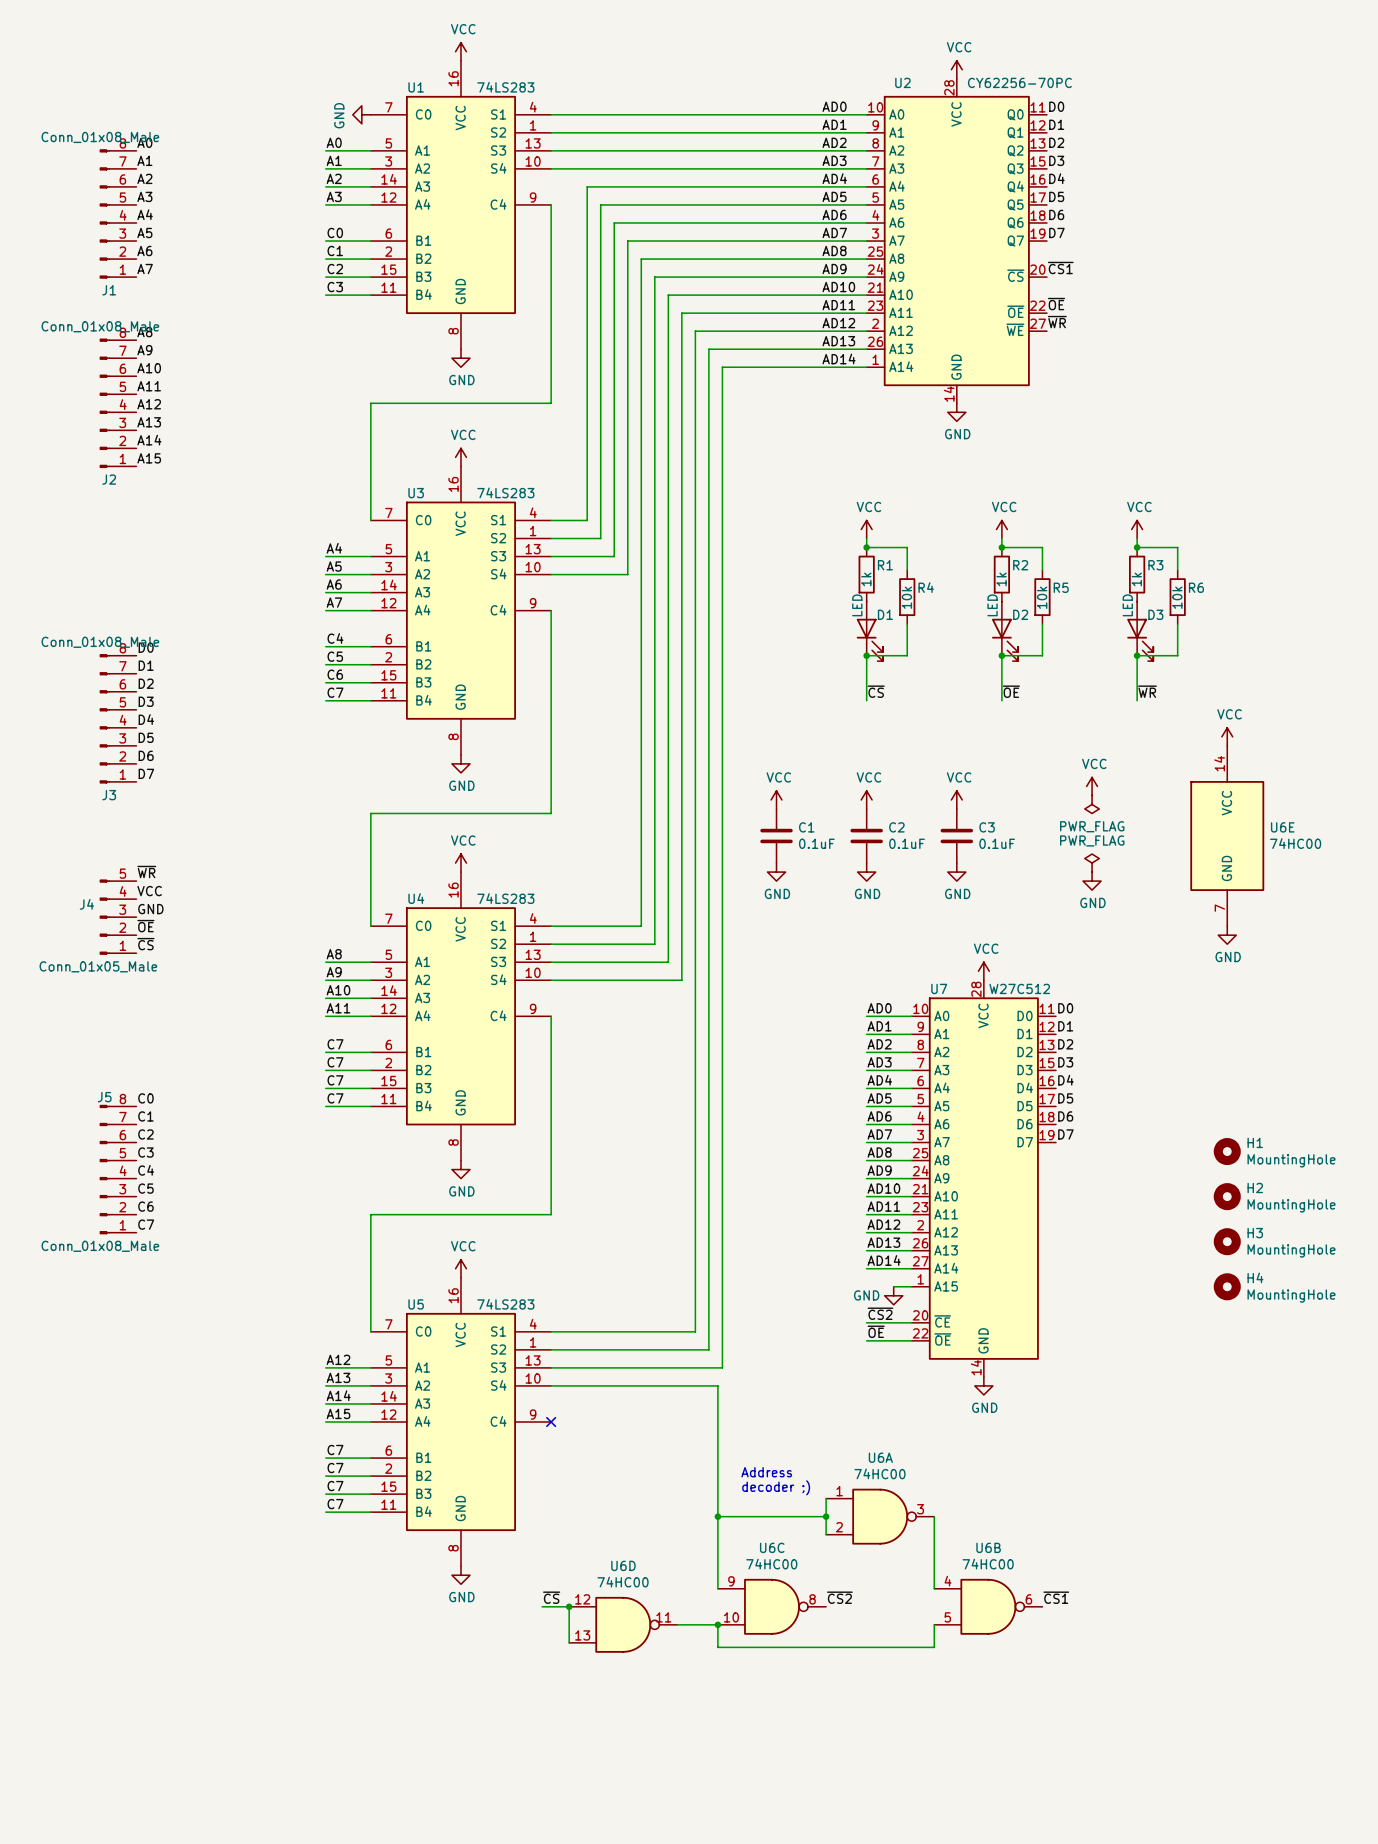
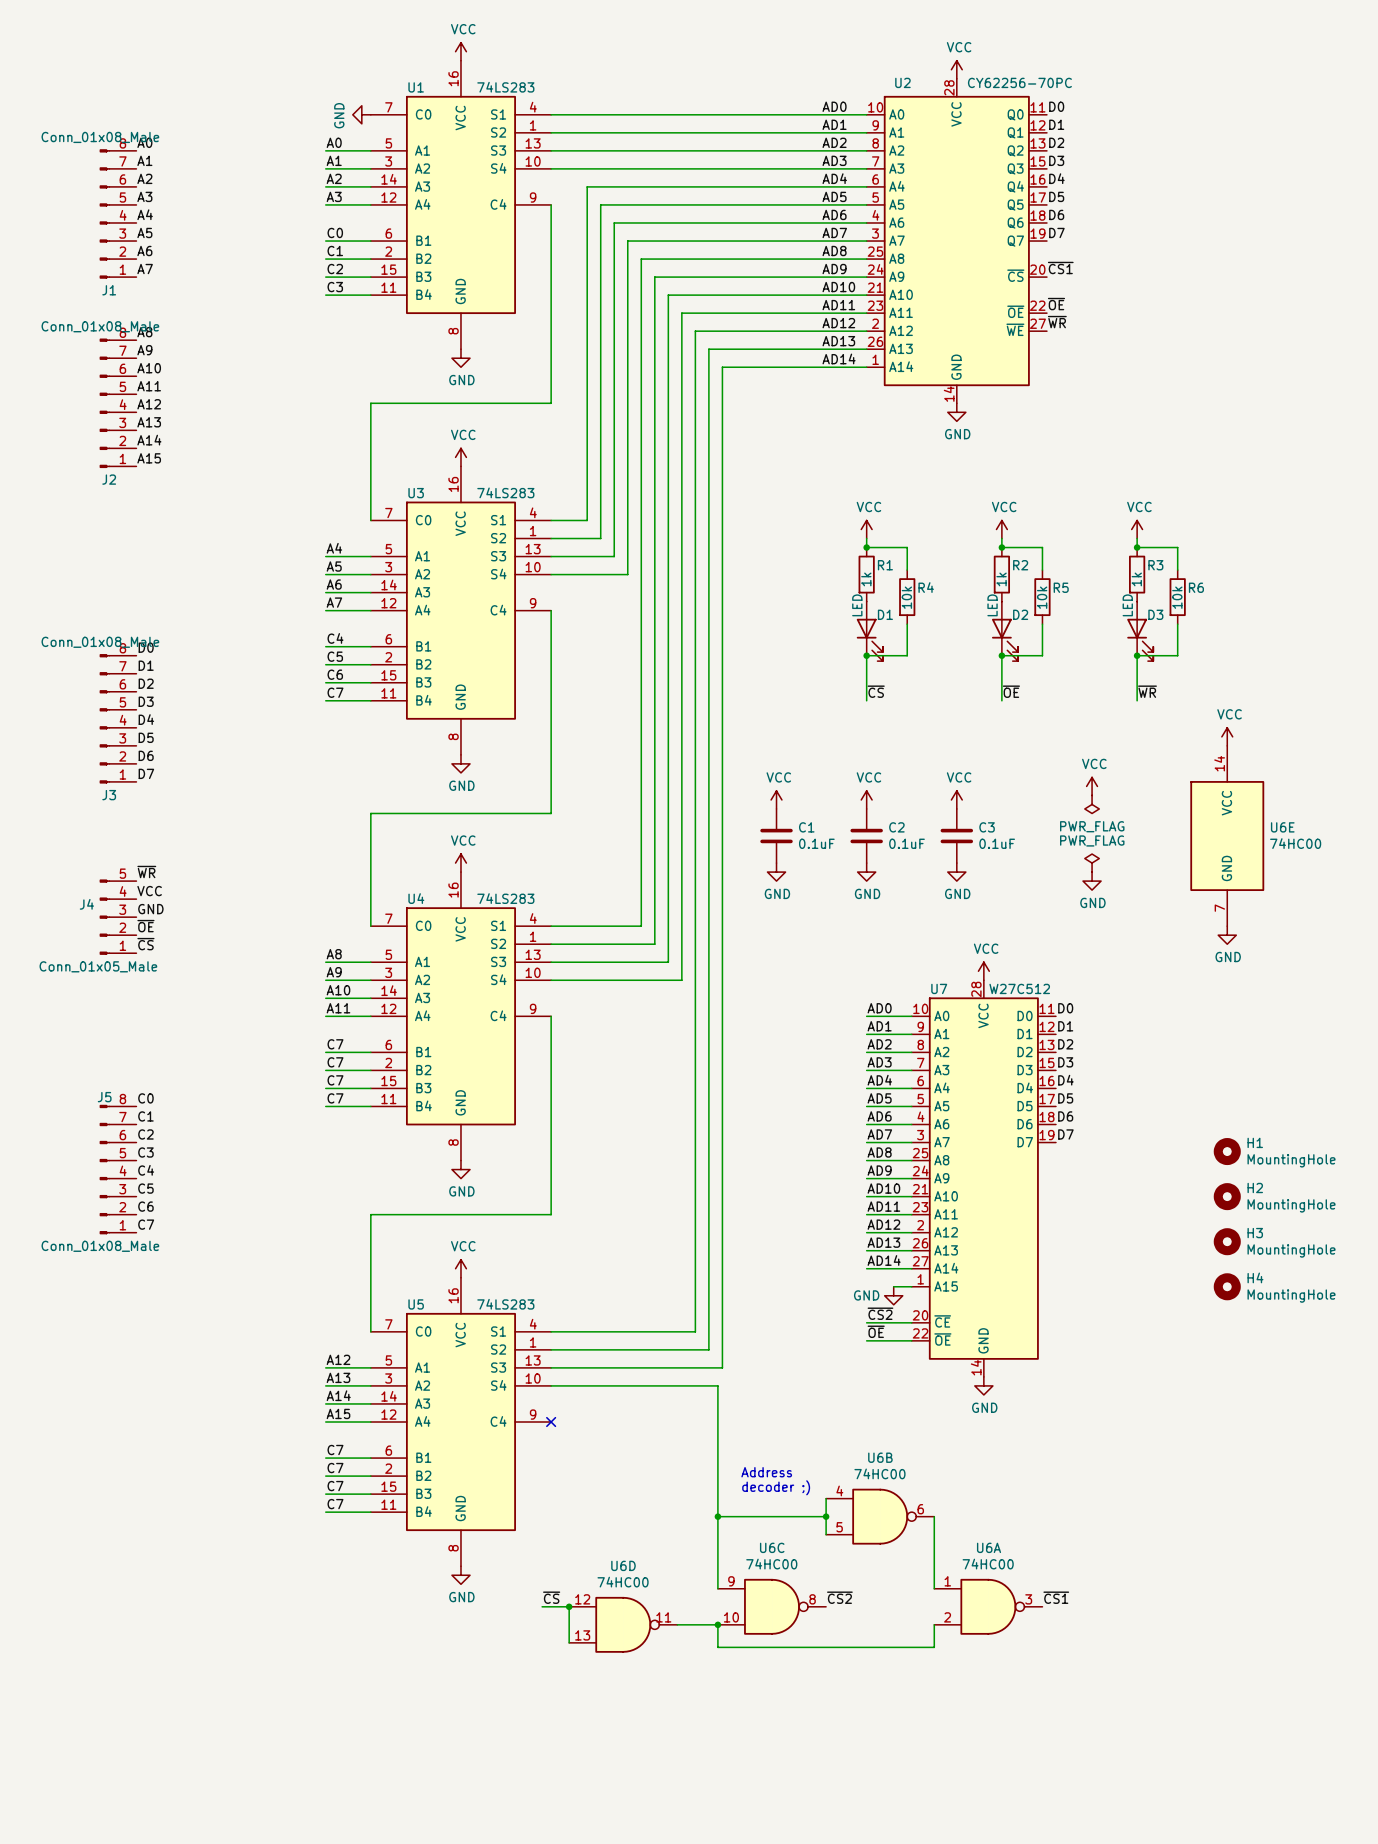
U6A position: (880, 1516) -> (988, 1606)
U6B position: (988, 1606) -> (880, 1516)

